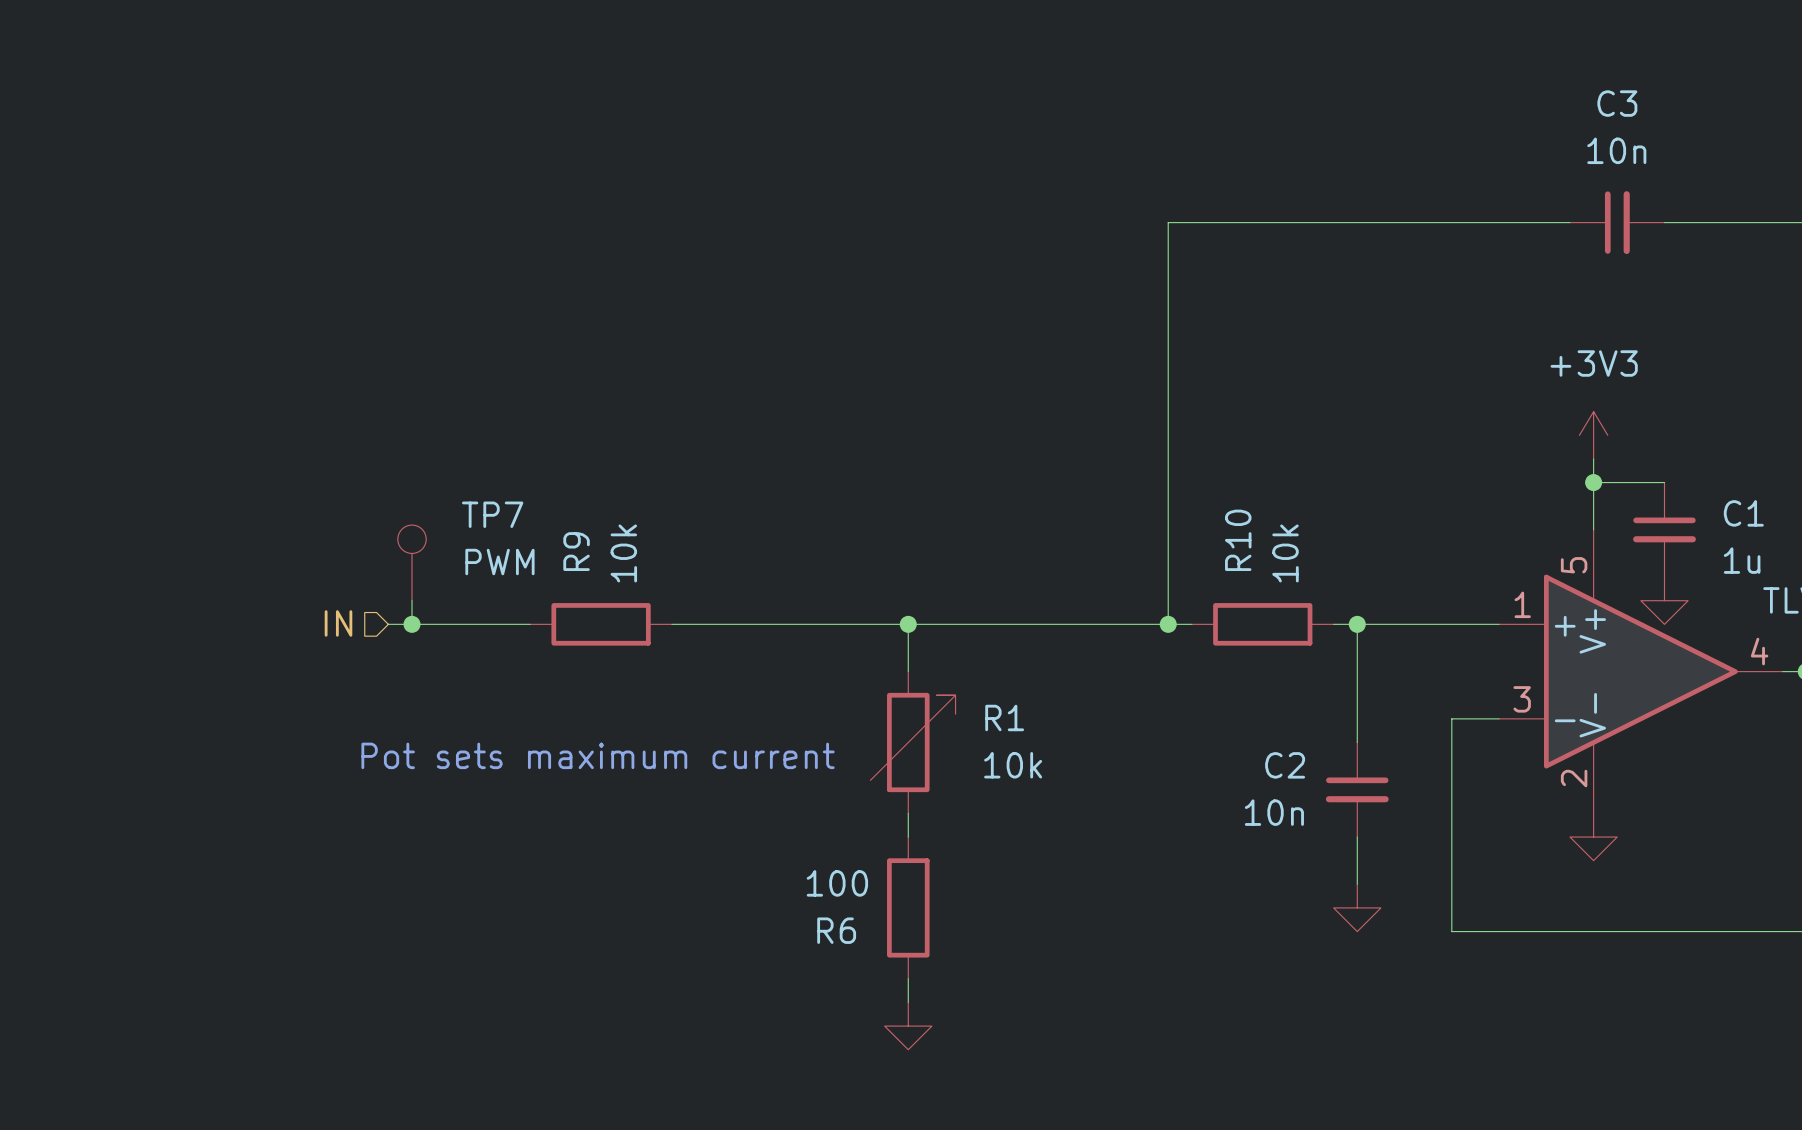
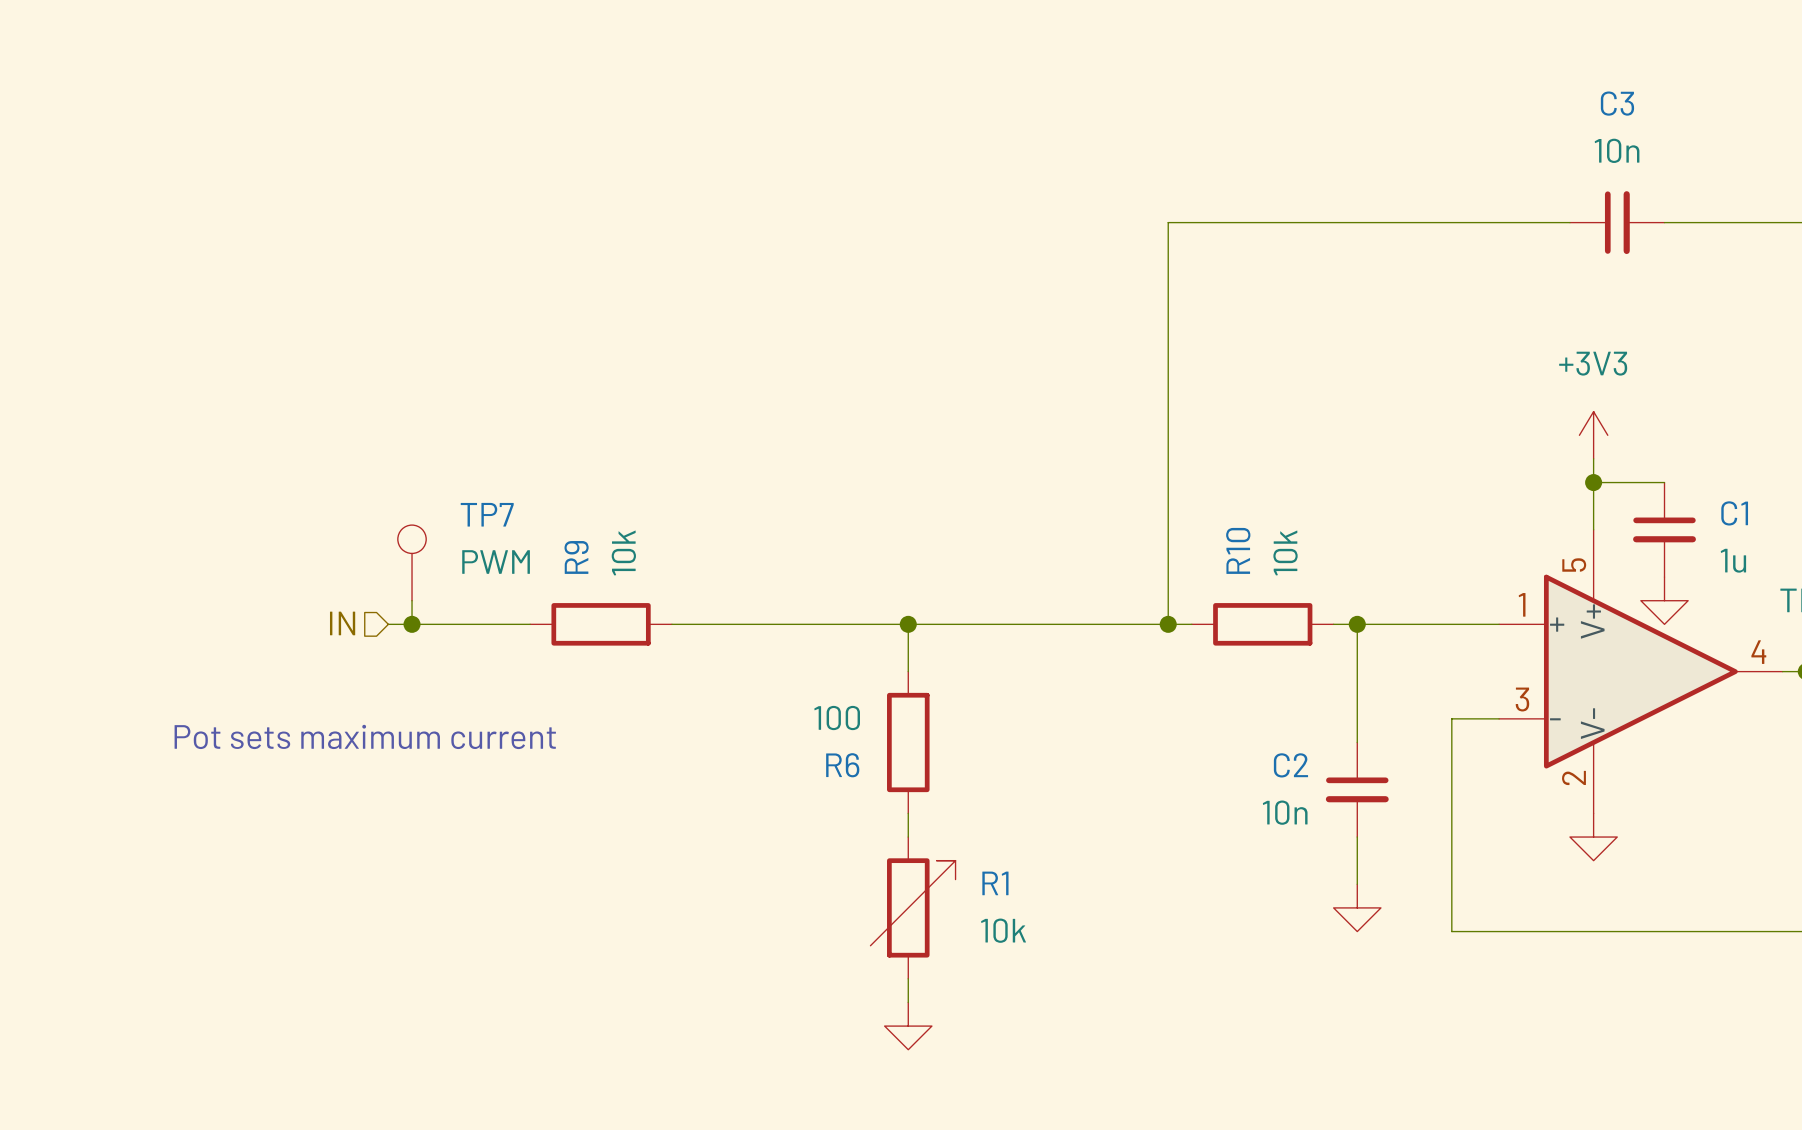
R1 position: (913, 742) -> (913, 907)
text position: Pot sets maximum current (598, 755) -> Pot sets maximum current (365, 736)
R6 position: (908, 907) -> (908, 742)

